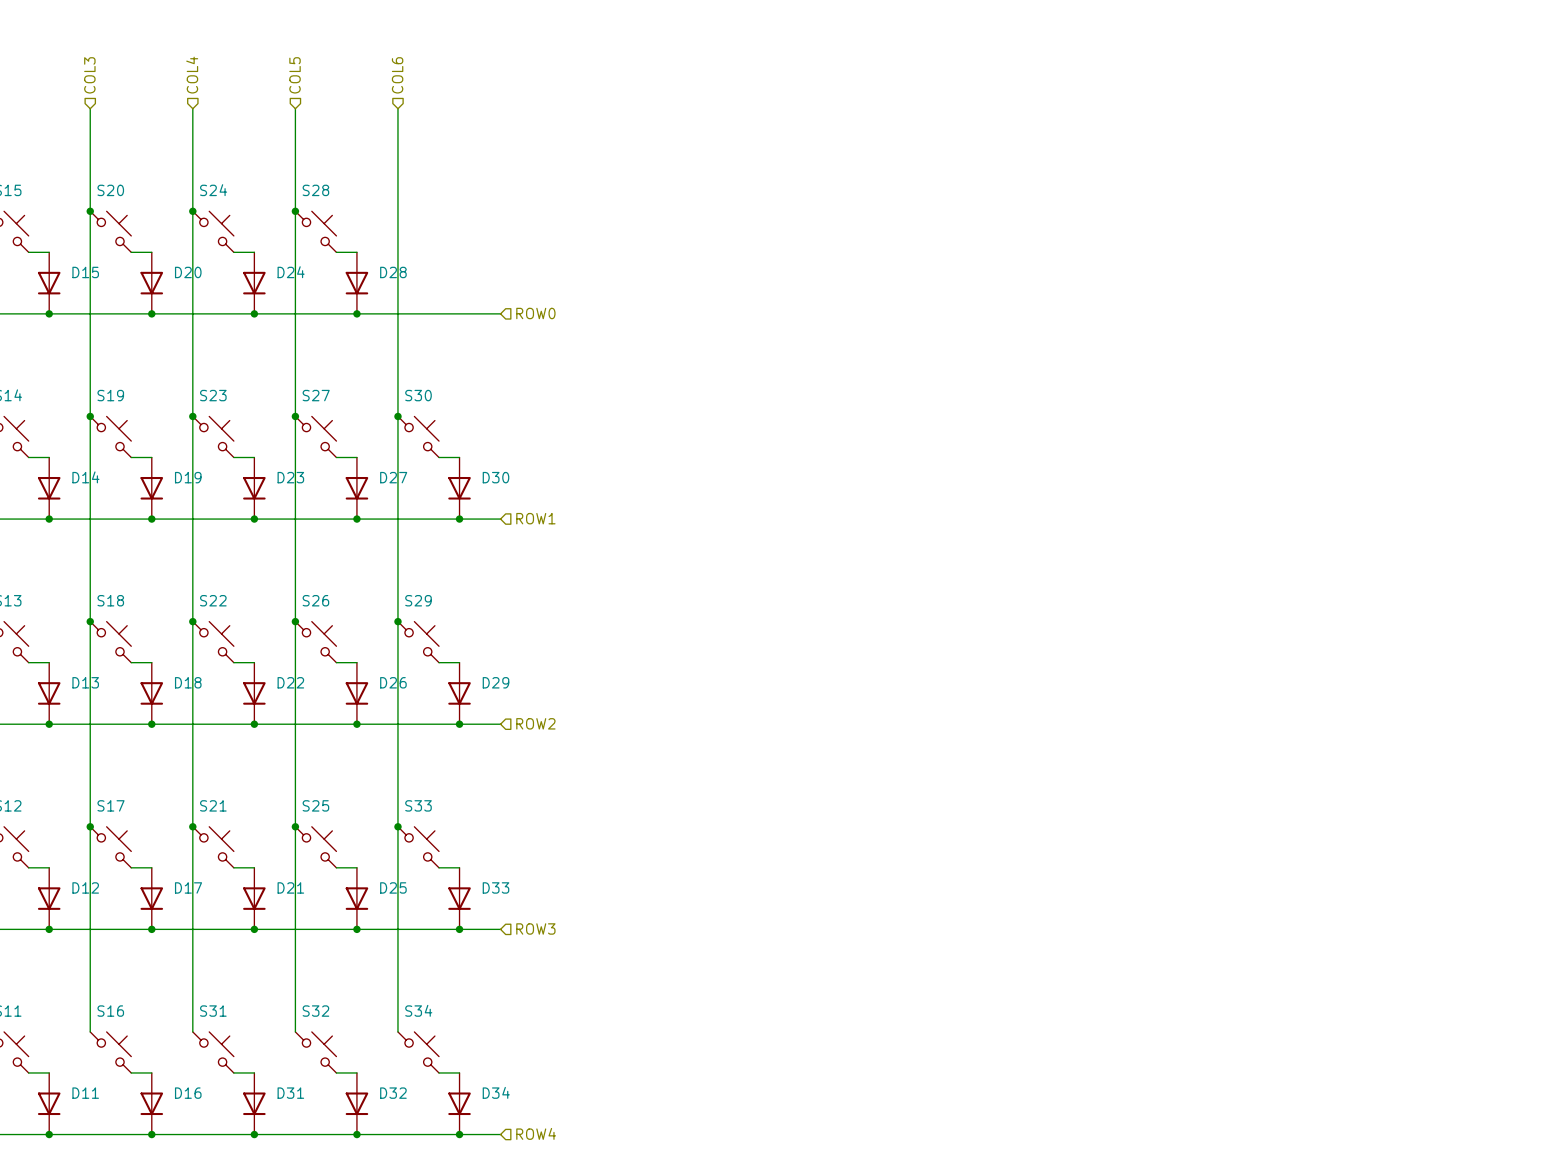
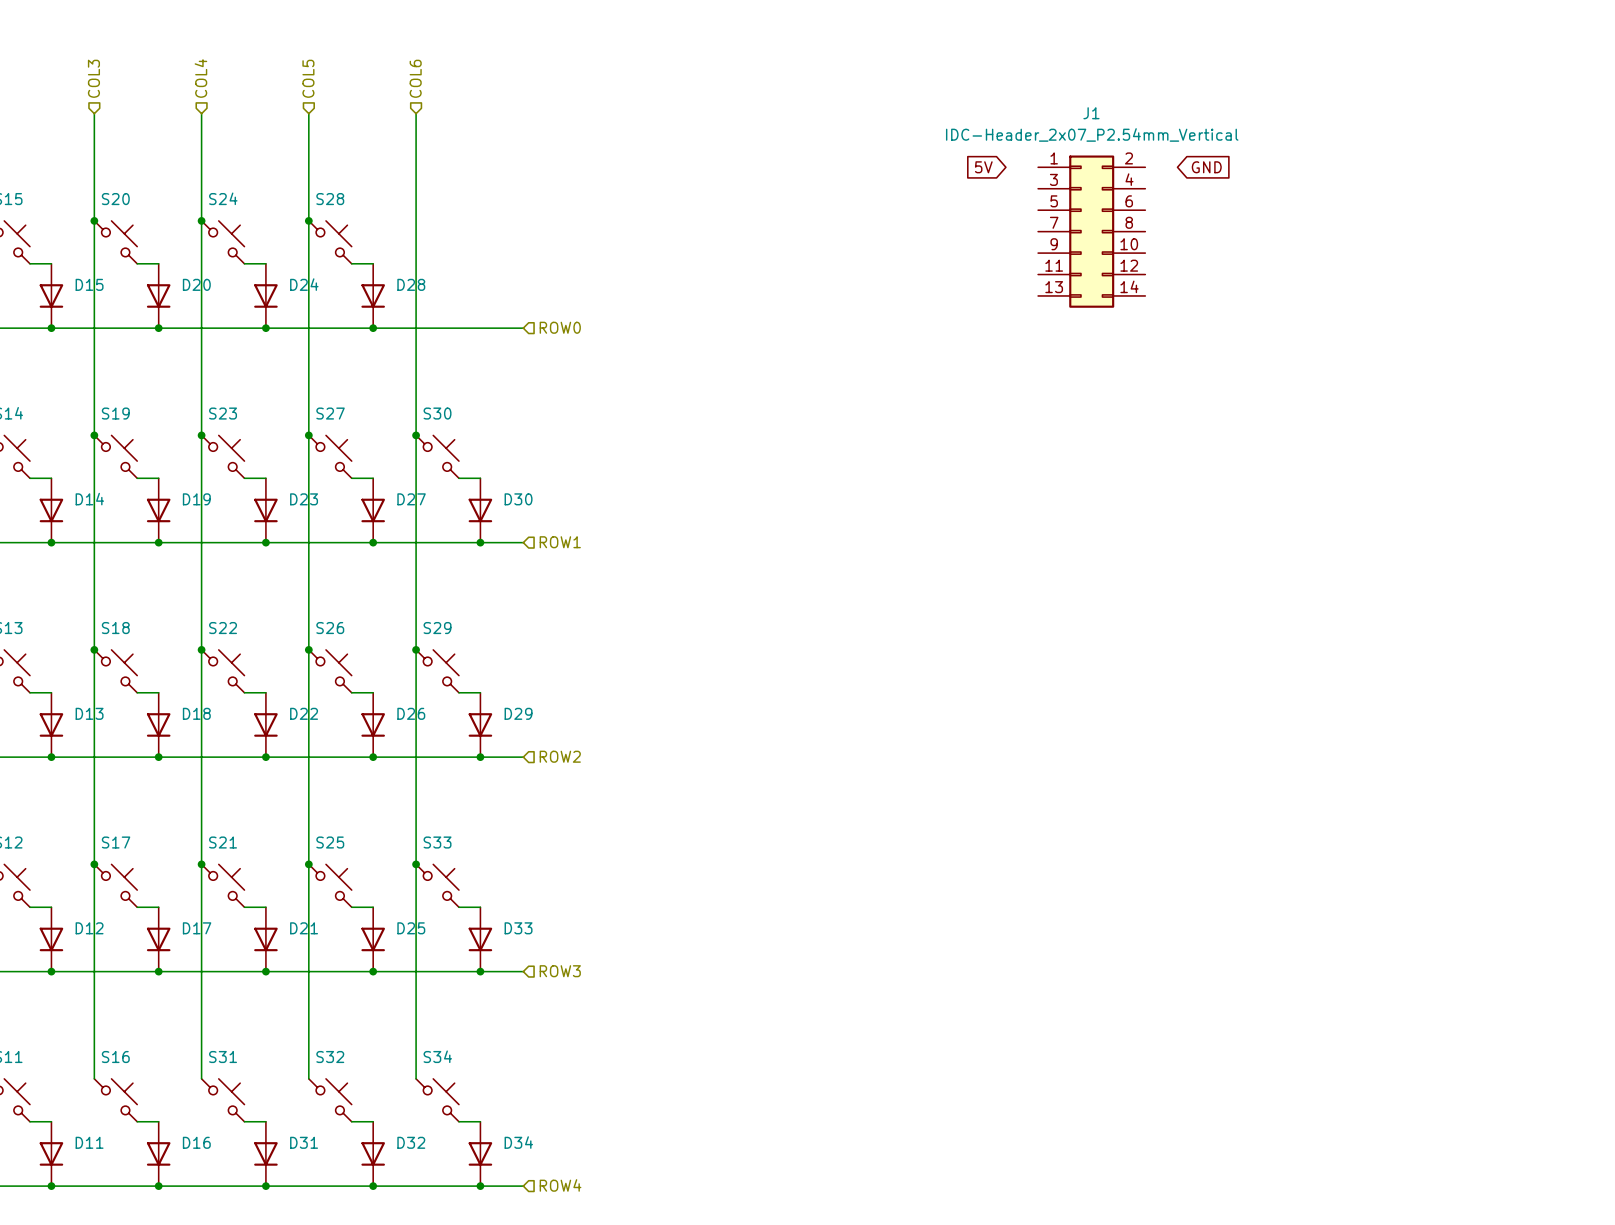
global label: none -> 5V (983, 167)
global label: none -> GND (1206, 167)
J1: none -> IDC-Header_2x07_P2.54mm_Vertical (1091, 231)

